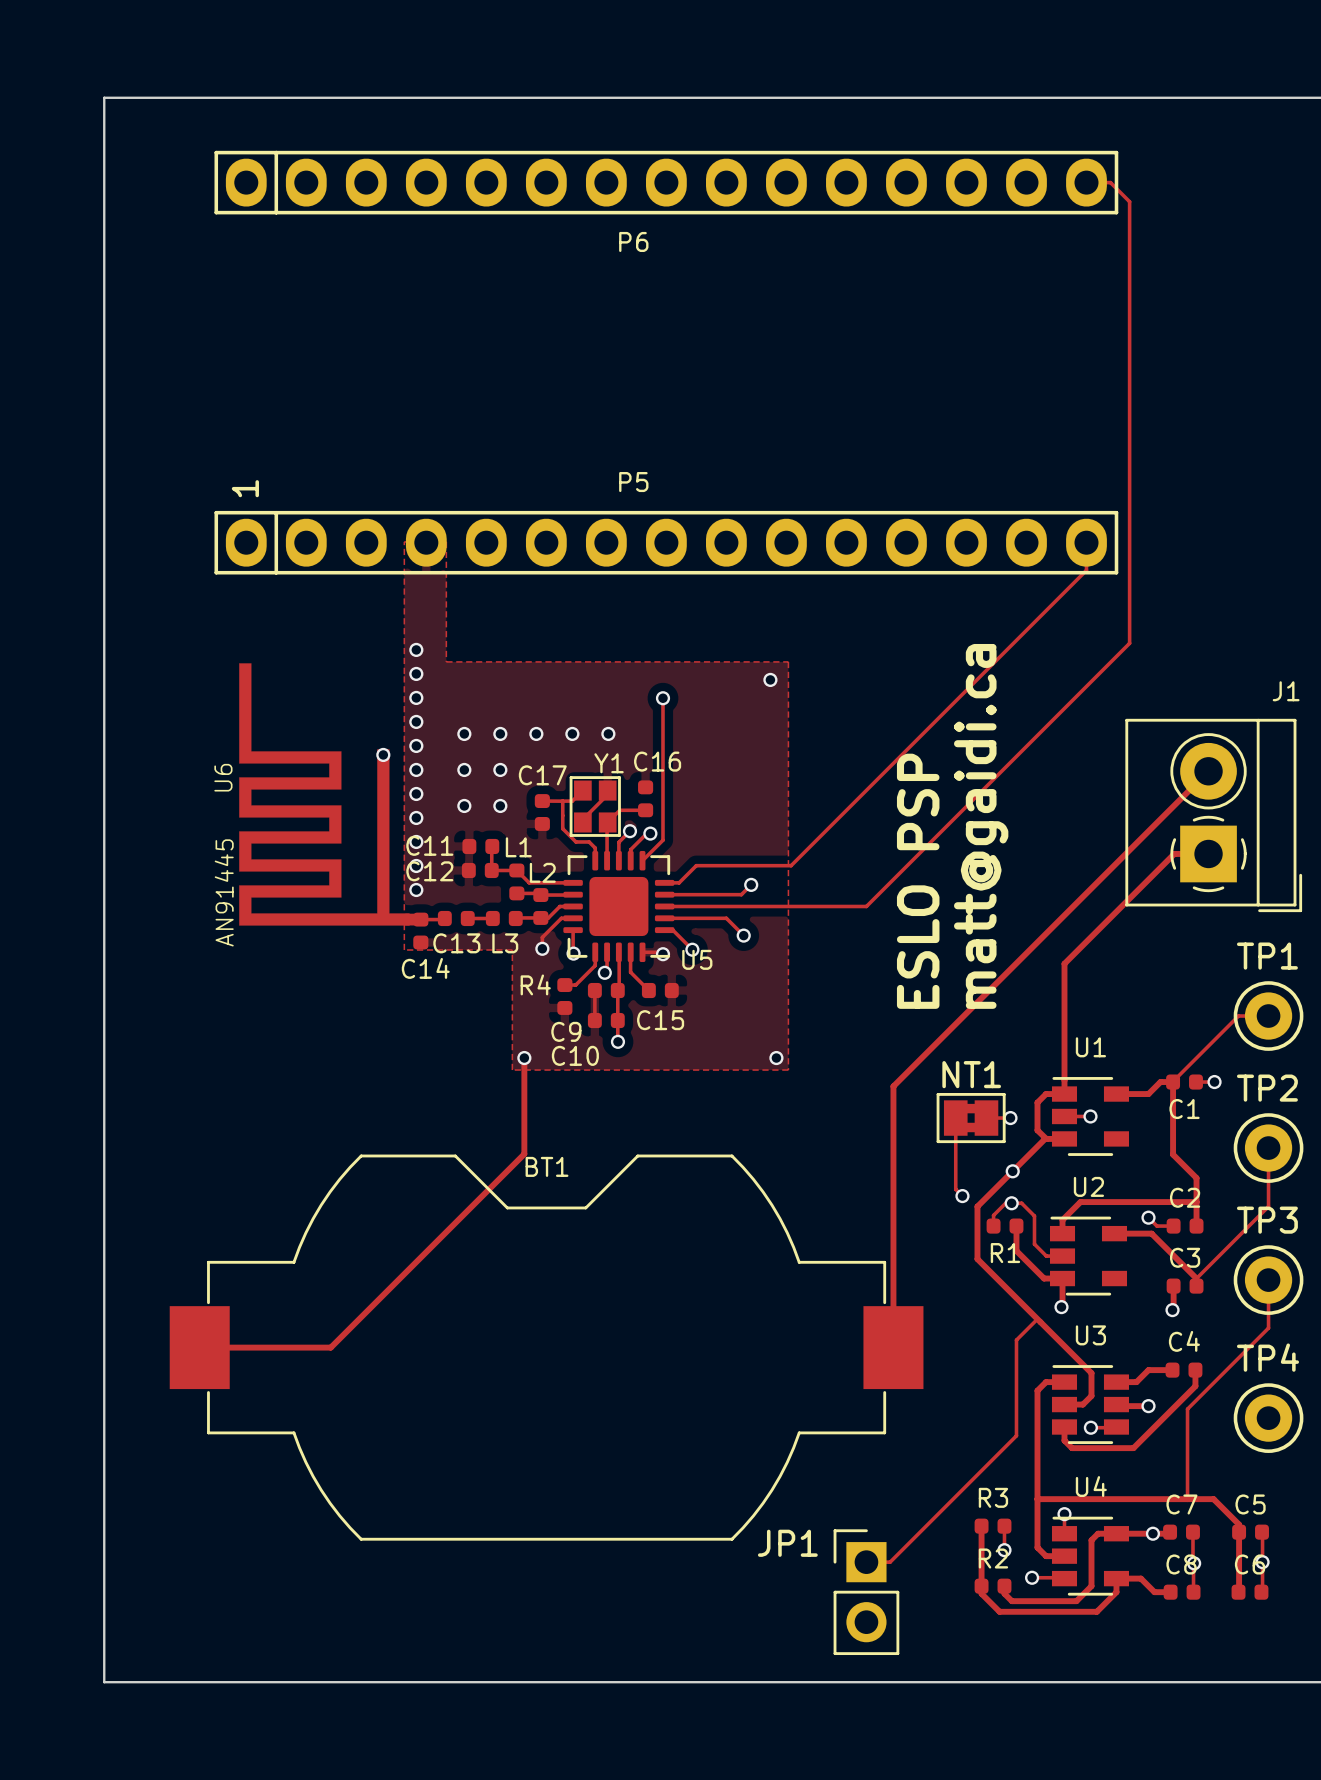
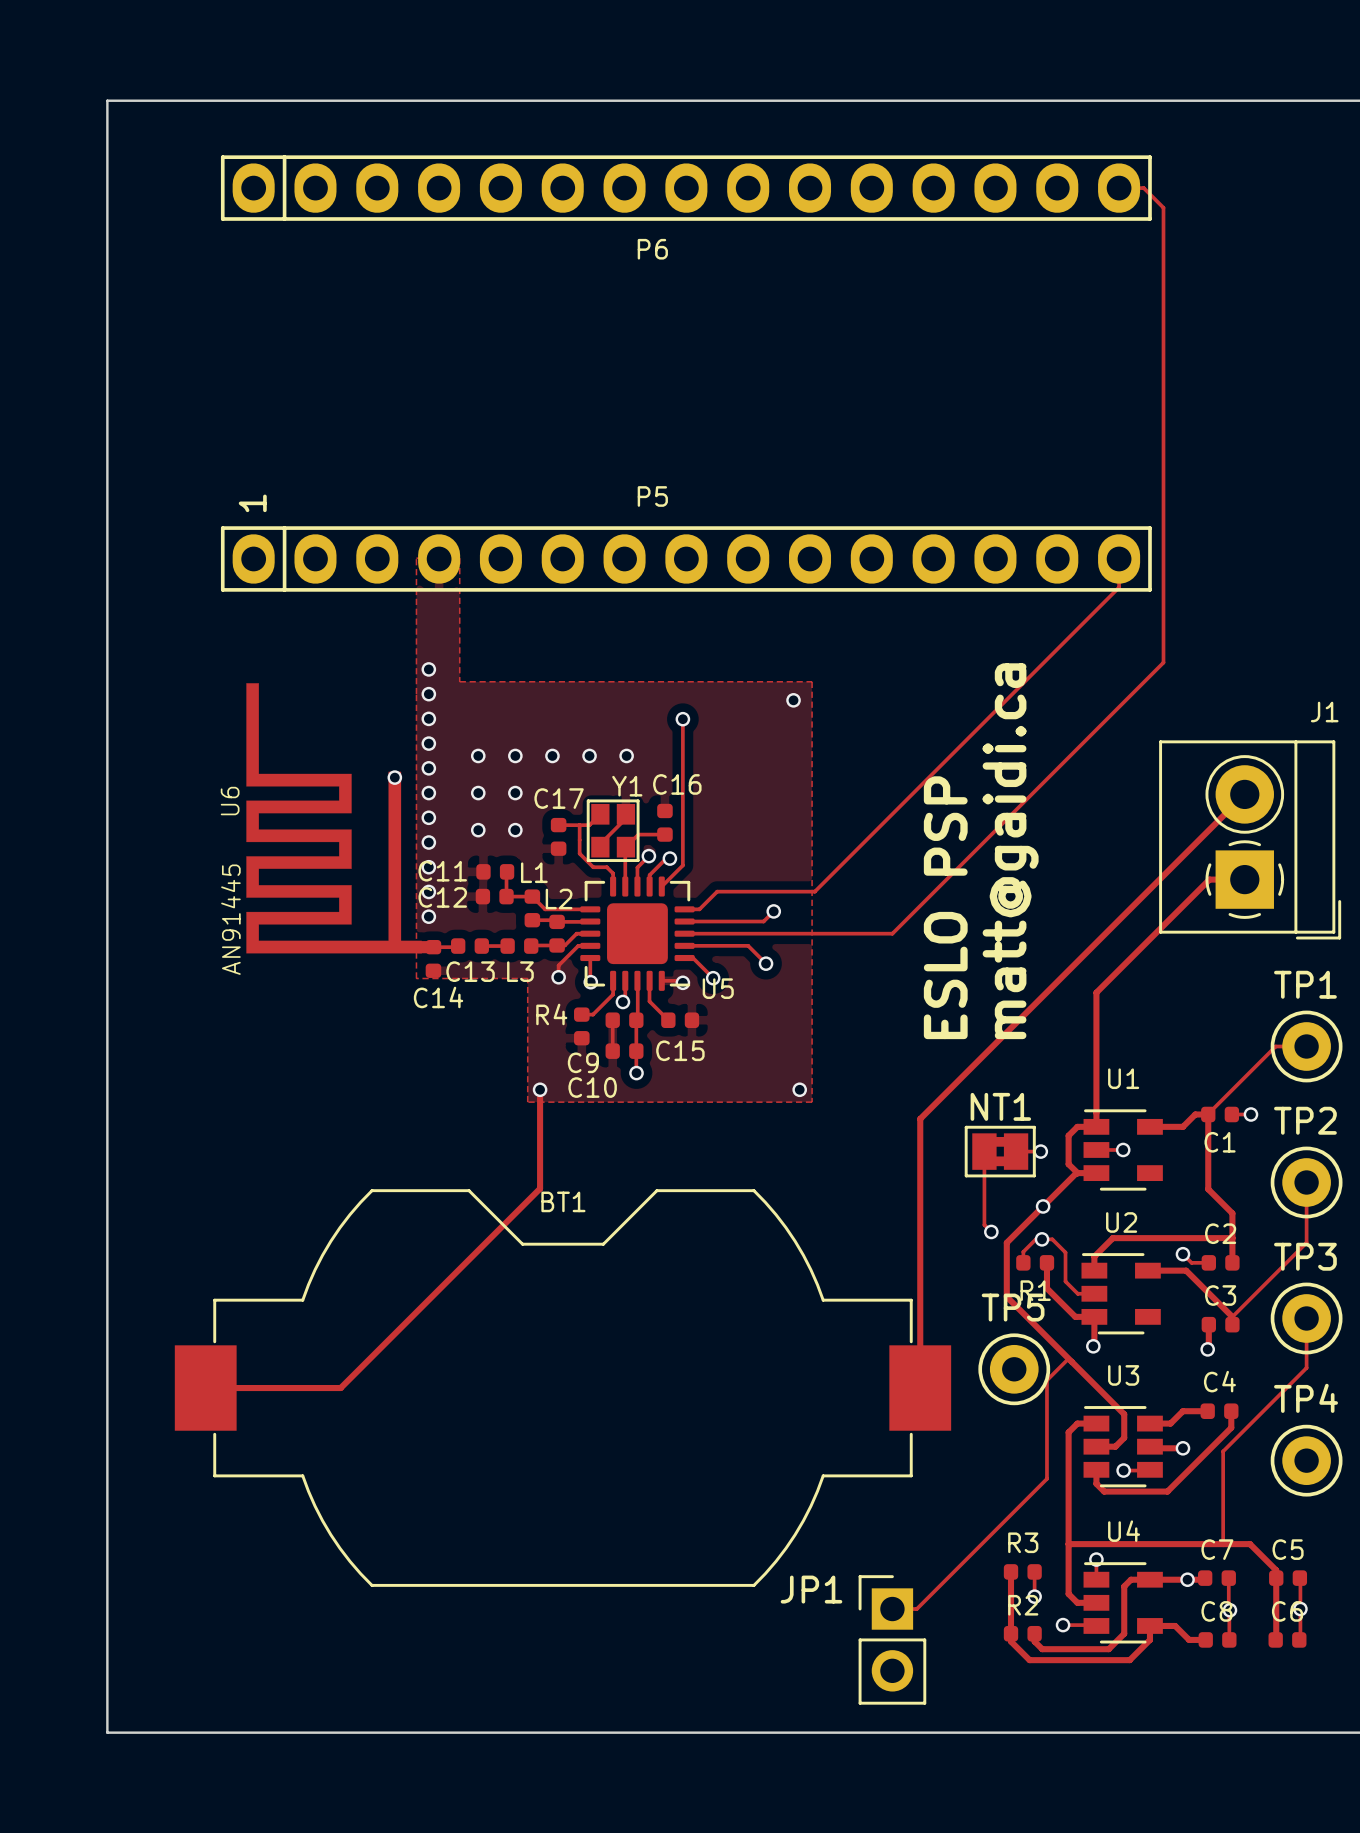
TP5: none -> (1014, 1369)

